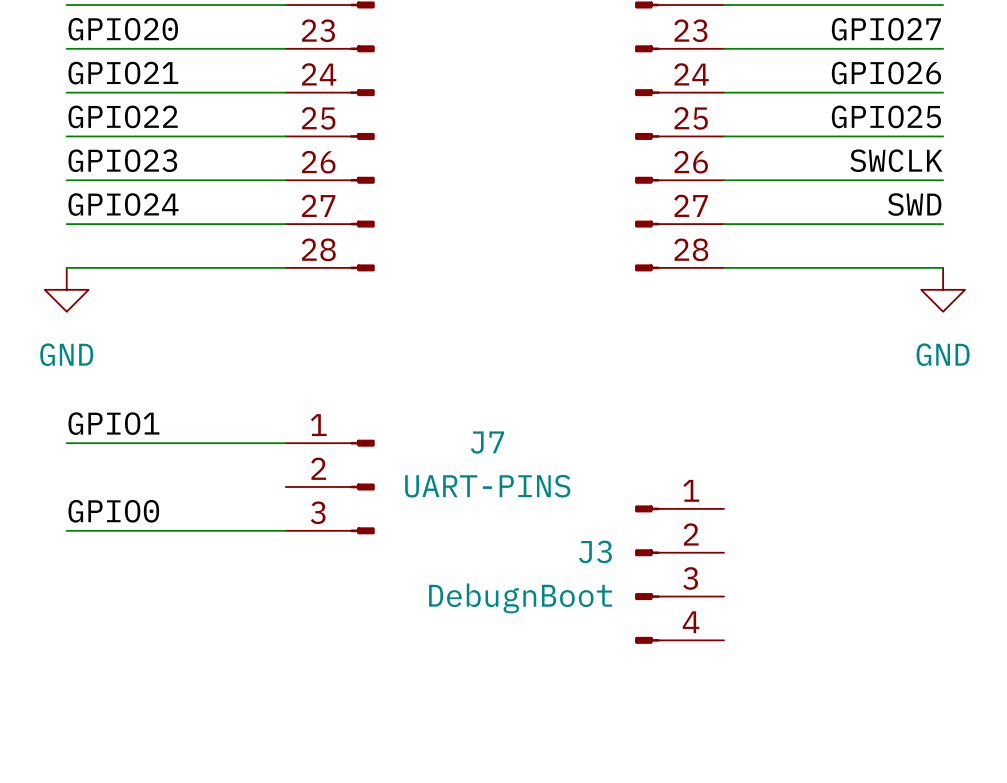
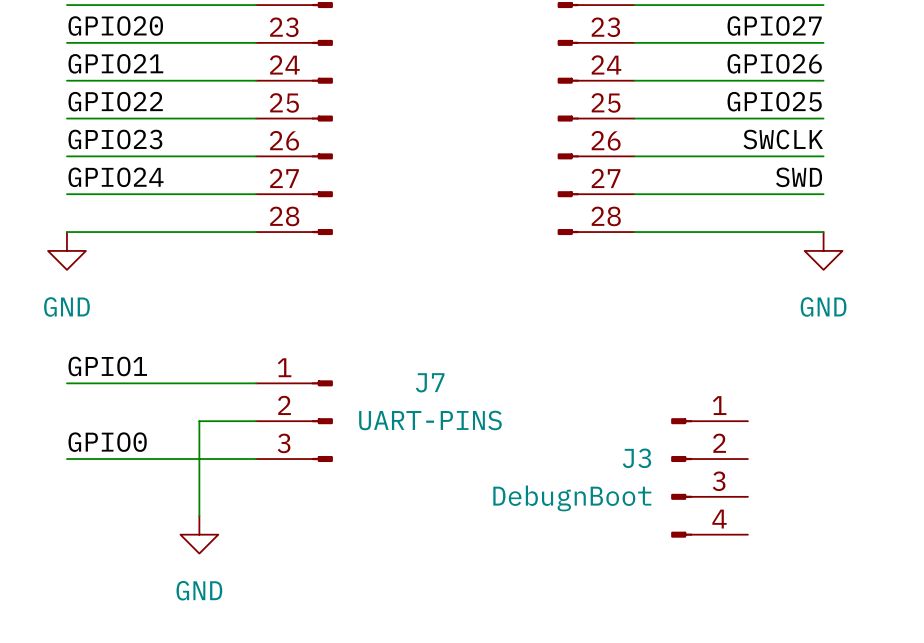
wire: none -> (256, 421) (199, 421) (199, 515)
J3 position: (679, 574) -> (709, 477)
power symbol: none -> GND (199, 534)

